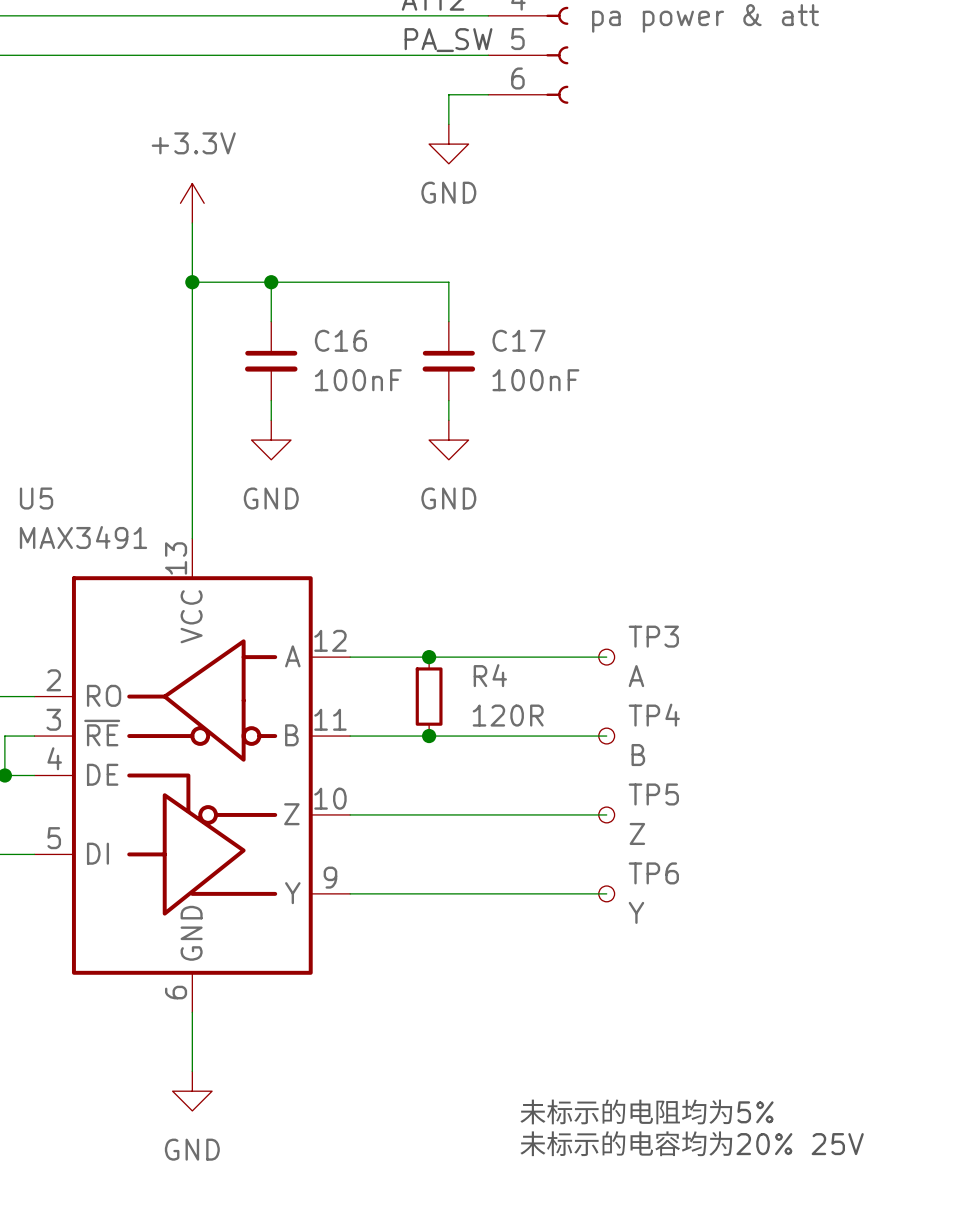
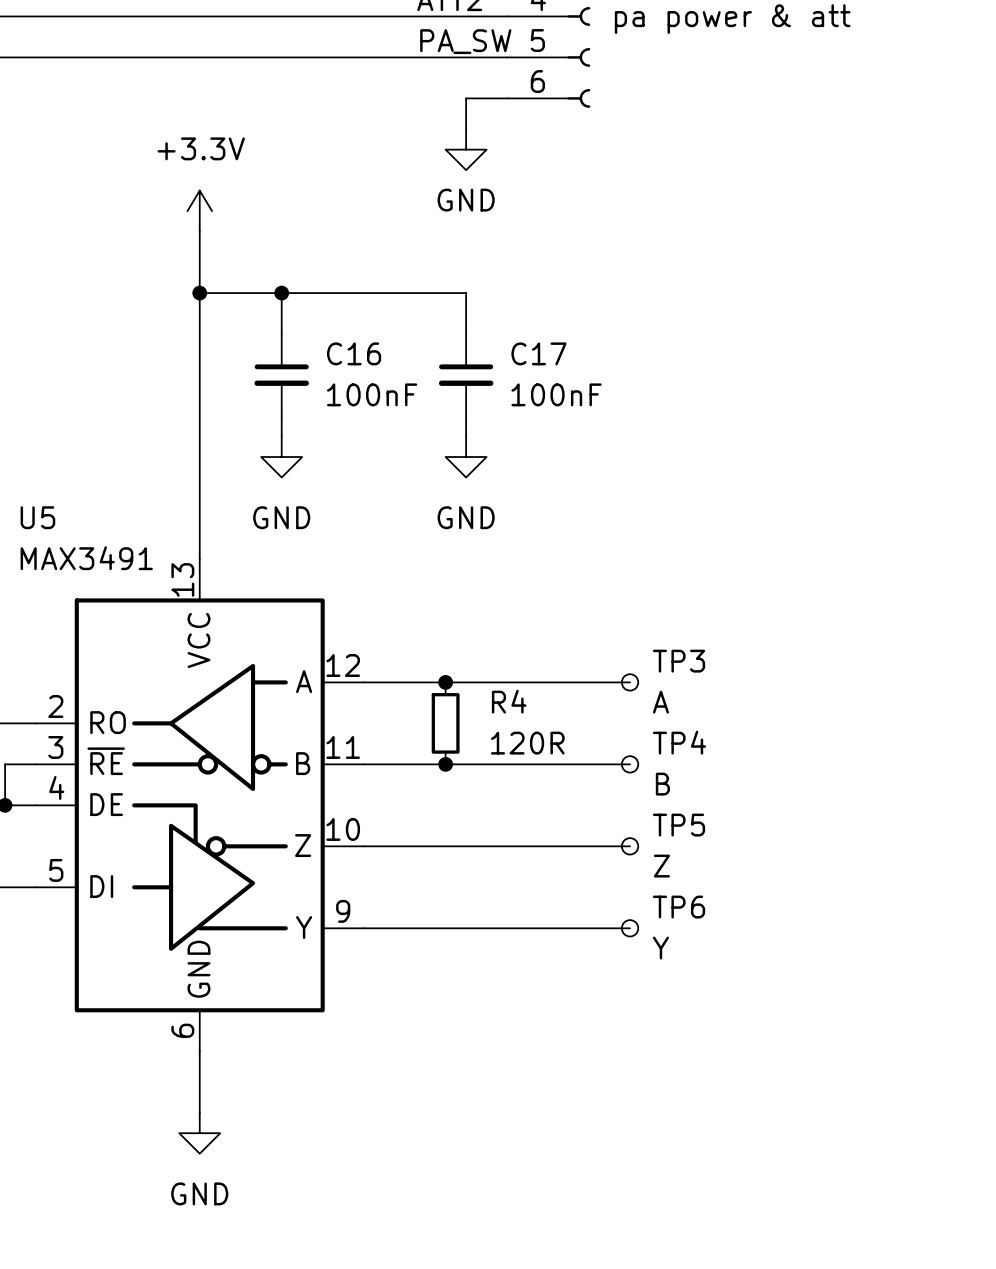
text: 未标示的电阻均为5% (646, 1111) -> none
text: 未标示的电容均为20% 25V (691, 1143) -> none

